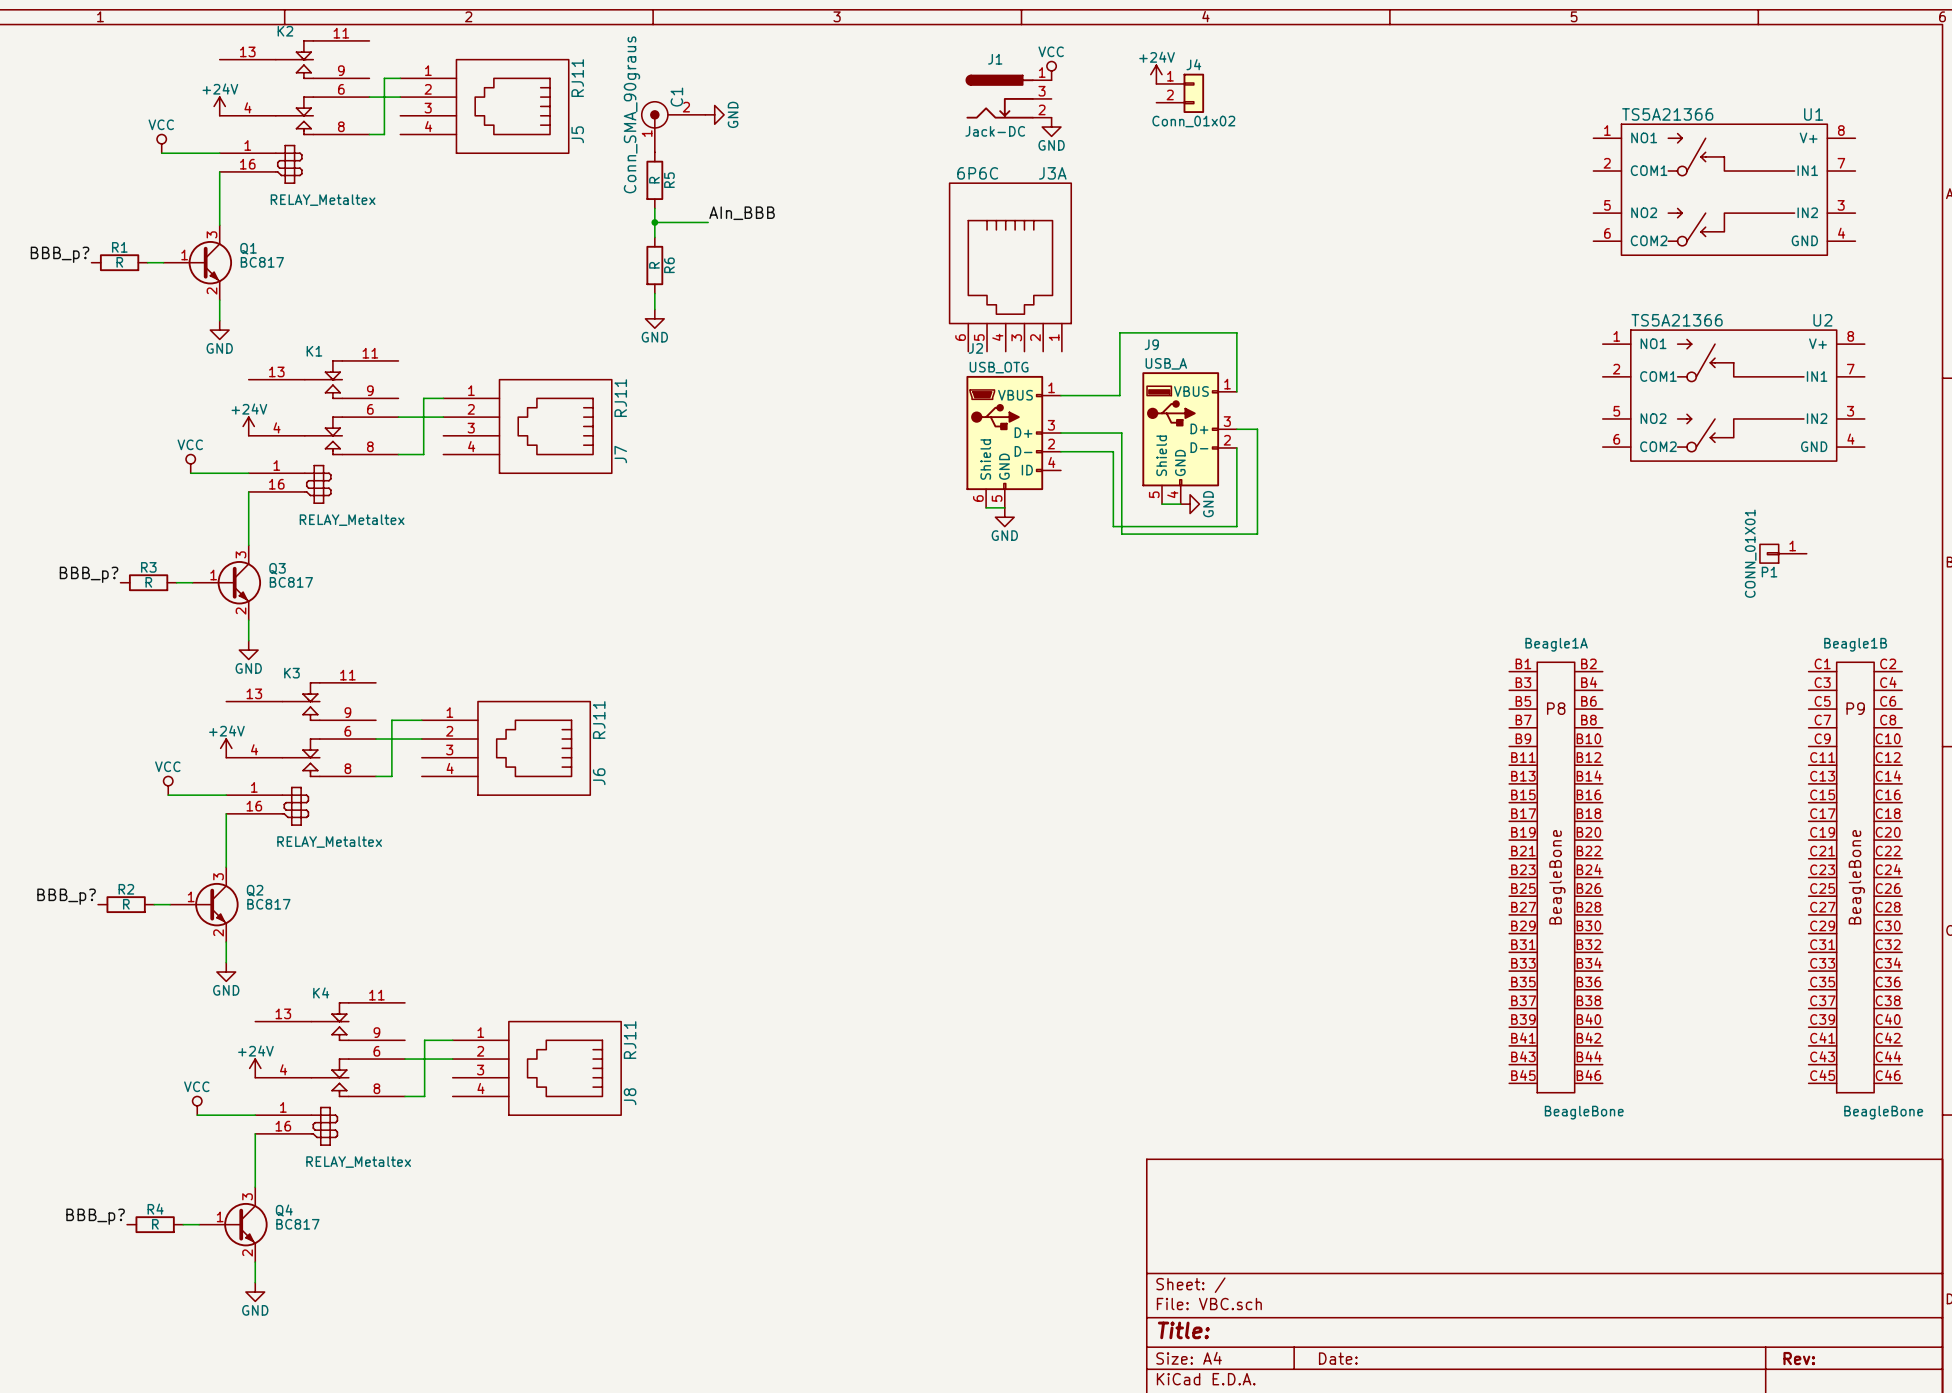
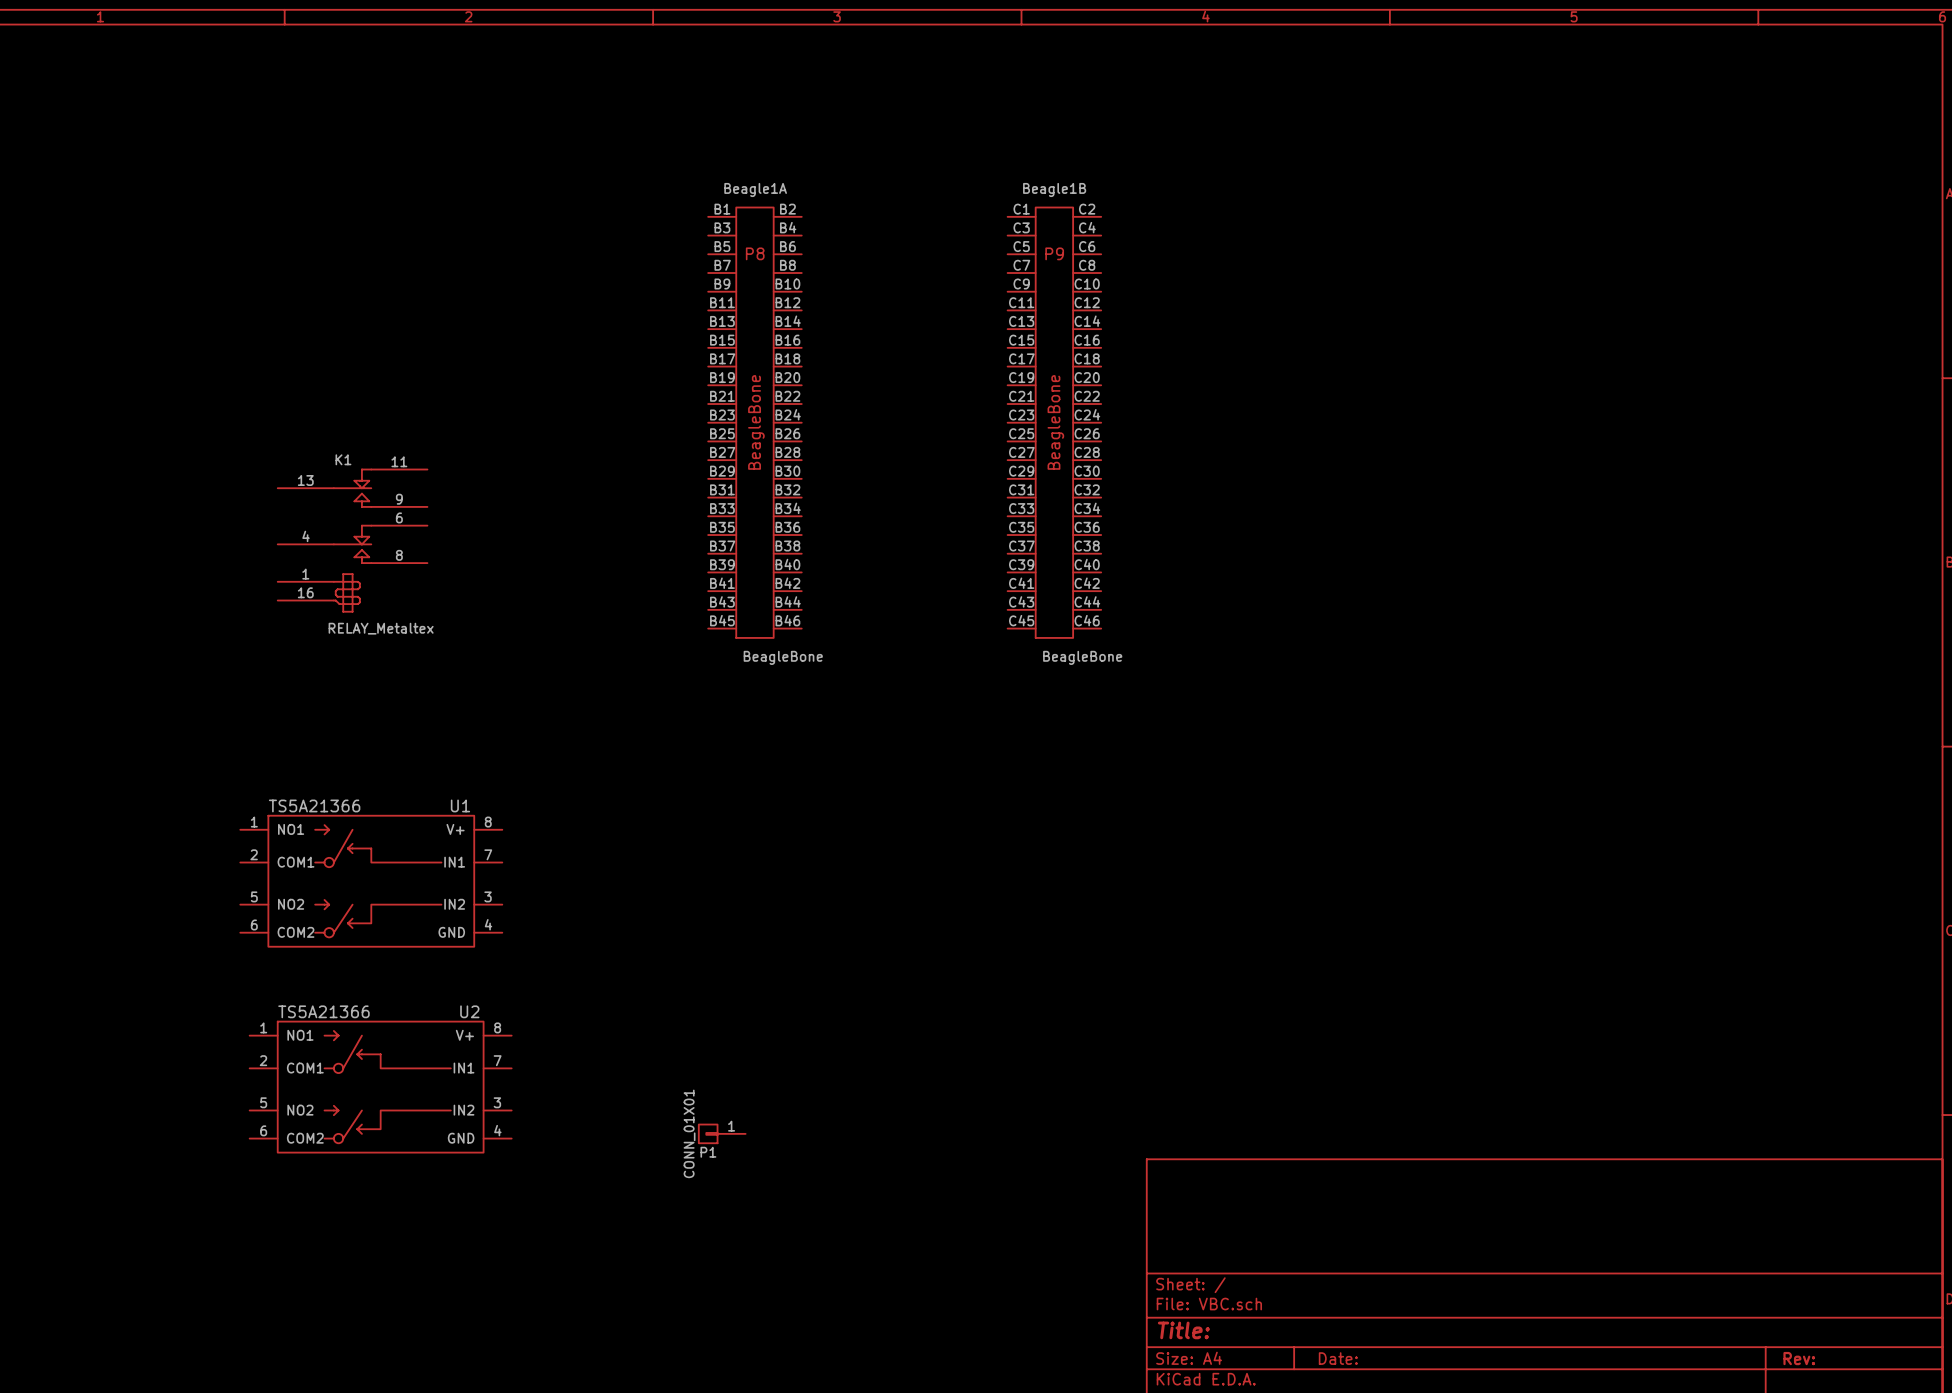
power symbol: VCC (1051, 70) -> none
power symbol: +24V (1156, 74) -> none
wire: (400, 78) (384, 78) (384, 134) (369, 134) -> none
J4: Conn_01x02 (1180, 93) -> none
J1: Jack-DC (1008, 96) -> none
wire: (369, 97) (400, 97) -> none
power symbol: +24V (219, 106) -> none
J5: RJ11 (484, 106) -> none
K2: RELAY_Metaltex (294, 112) -> none
power symbol: GND (714, 114) -> none
C1: Conn_SMA_90graus (673, 127) -> none
power symbol: GND (1051, 127) -> none
power symbol: VCC (161, 143) -> none
wire: (161, 153) (219, 153) -> none
wire: (219, 171) (219, 225) -> none
R5: R (654, 180) -> none
U1 position: (1724, 189) -> (371, 881)
wire: (654, 208) (654, 237) -> none
label: AIn_BBB (742, 213) -> none
wire: (654, 222) (708, 222) -> none
junction: (654, 222) -> none
label: BBB_p? (60, 254) -> none
R1: R (119, 262) -> none
wire: (147, 262) (163, 262) -> none
Q1: BC817 (197, 262) -> none
R6: R (654, 265) -> none
J3A: 6P6C (1010, 267) -> none
wire: (654, 293) (654, 309) -> none
wire: (219, 300) (219, 320) -> none
power symbol: GND (654, 318) -> none
power symbol: GND (219, 330) -> none
wire: (1236, 391) (1236, 332) (1119, 332) (1119, 395) (1060, 395) -> none
U2 position: (1733, 395) -> (380, 1087)
wire: (443, 398) (423, 398) (423, 454) (398, 454) -> none
wire: (398, 417) (443, 417) -> none
power symbol: +24V (248, 426) -> none
J7: RJ11 (527, 426) -> none
wire: (1236, 429) (1257, 429) (1257, 534) (1121, 534) (1121, 433) (1060, 433) -> none
K1 position: (323, 432) -> (352, 540)
J9: USB_A (1189, 438) -> none
J2: USB_OTG (1013, 441) -> none
wire: (1236, 447) (1236, 526) (1113, 526) (1113, 451) (1060, 451) -> none
power symbol: VCC (190, 463) -> none
wire: (190, 473) (248, 473) -> none
wire: (248, 491) (248, 545) -> none
wire: (1162, 504) (1180, 504) -> none
power symbol: GND (1190, 504) -> none
wire: (986, 507) (1004, 507) -> none
power symbol: GND (1004, 517) -> none
P1 position: (1783, 553) -> (722, 1133)
label: BBB_p? (89, 574) -> none
R3: R (148, 582) -> none
wire: (176, 582) (192, 582) -> none
Q3: BC817 (226, 582) -> none
wire: (248, 620) (248, 640) -> none
power symbol: GND (248, 650) -> none
wire: (421, 720) (391, 720) (391, 776) (375, 776) -> none
wire: (375, 739) (421, 739) -> none
power symbol: +24V (226, 748) -> none
J6: RJ11 (506, 748) -> none
K3: RELAY_Metaltex (301, 753) -> none
power symbol: VCC (168, 785) -> none
wire: (168, 795) (226, 795) -> none
wire: (226, 813) (226, 867) -> none
Beagle1A position: (1555, 877) -> (754, 422)
Beagle1B position: (1855, 877) -> (1054, 422)
label: BBB_p? (66, 896) -> none
R2: R (126, 904) -> none
wire: (154, 904) (170, 904) -> none
Q2: BC817 (204, 904) -> none
wire: (226, 942) (226, 962) -> none
power symbol: GND (226, 972) -> none
wire: (452, 1040) (424, 1040) (424, 1096) (404, 1096) -> none
wire: (404, 1059) (452, 1059) -> none
power symbol: +24V (255, 1068) -> none
J8: RJ11 (536, 1068) -> none
K4: RELAY_Metaltex (330, 1074) -> none
power symbol: VCC (197, 1105) -> none
wire: (197, 1115) (255, 1115) -> none
wire: (255, 1133) (255, 1187) -> none
label: BBB_p? (95, 1216) -> none
R4: R (155, 1224) -> none
wire: (183, 1224) (199, 1224) -> none
Q4: BC817 (233, 1224) -> none
wire: (255, 1262) (255, 1282) -> none
power symbol: GND (255, 1292) -> none

